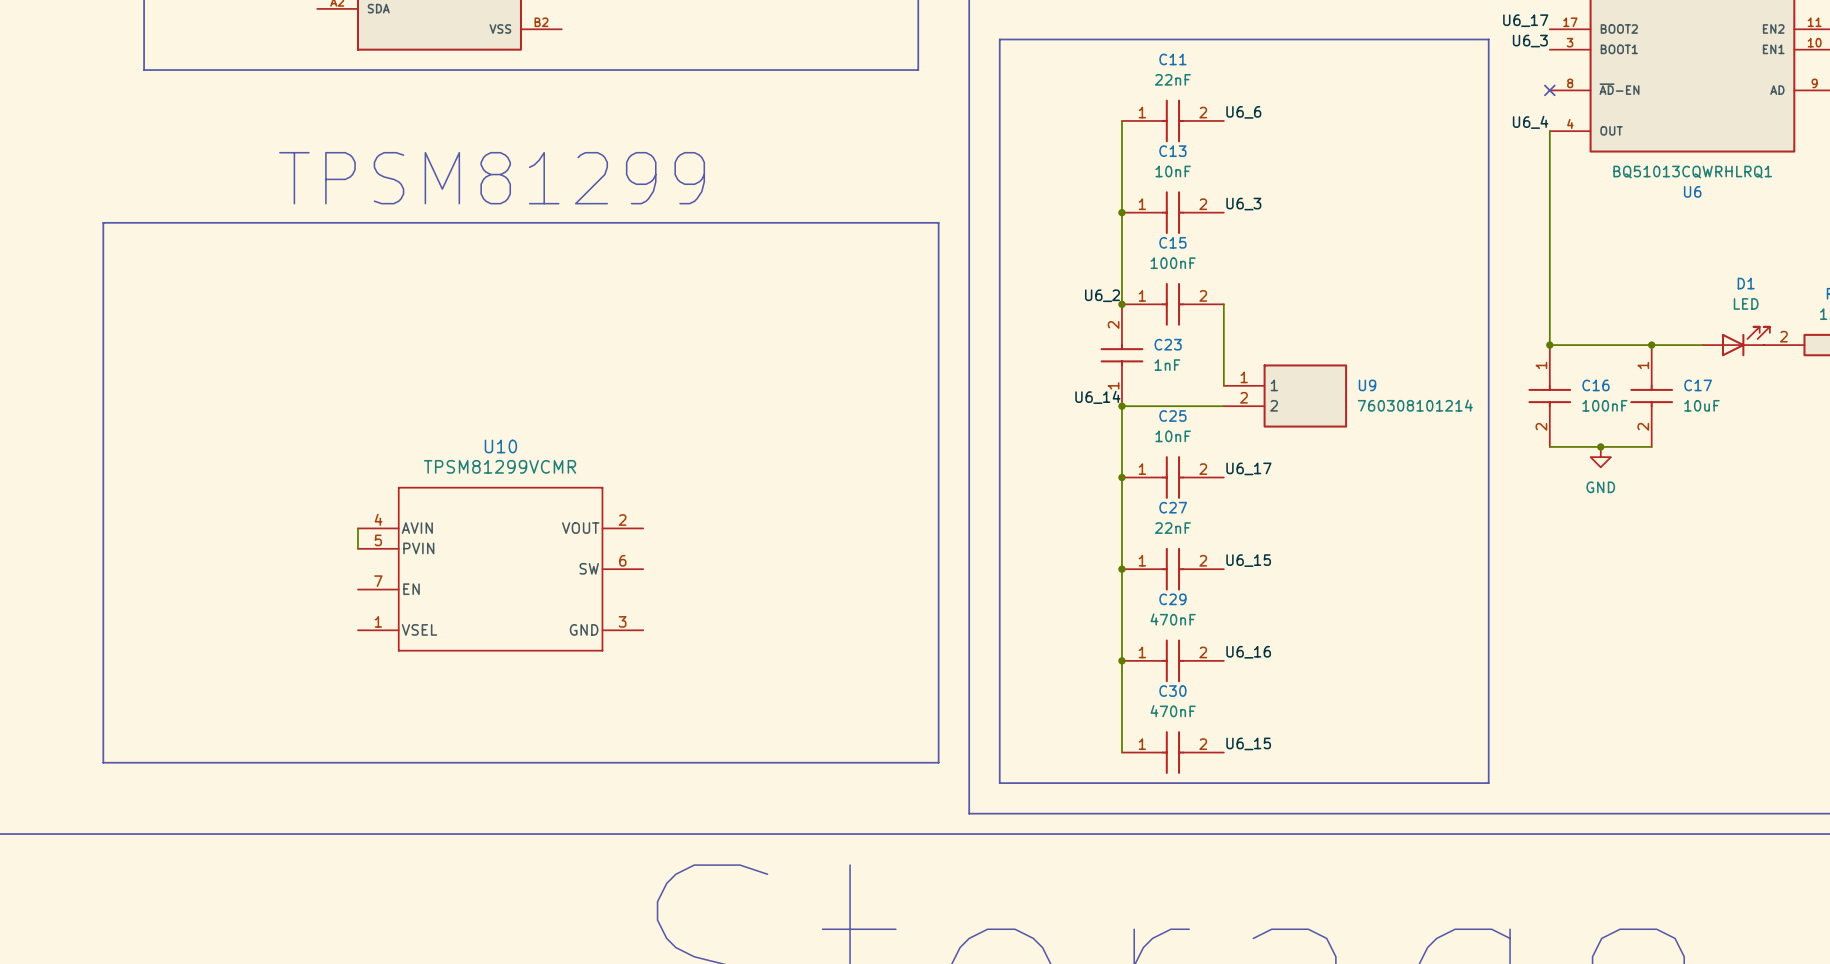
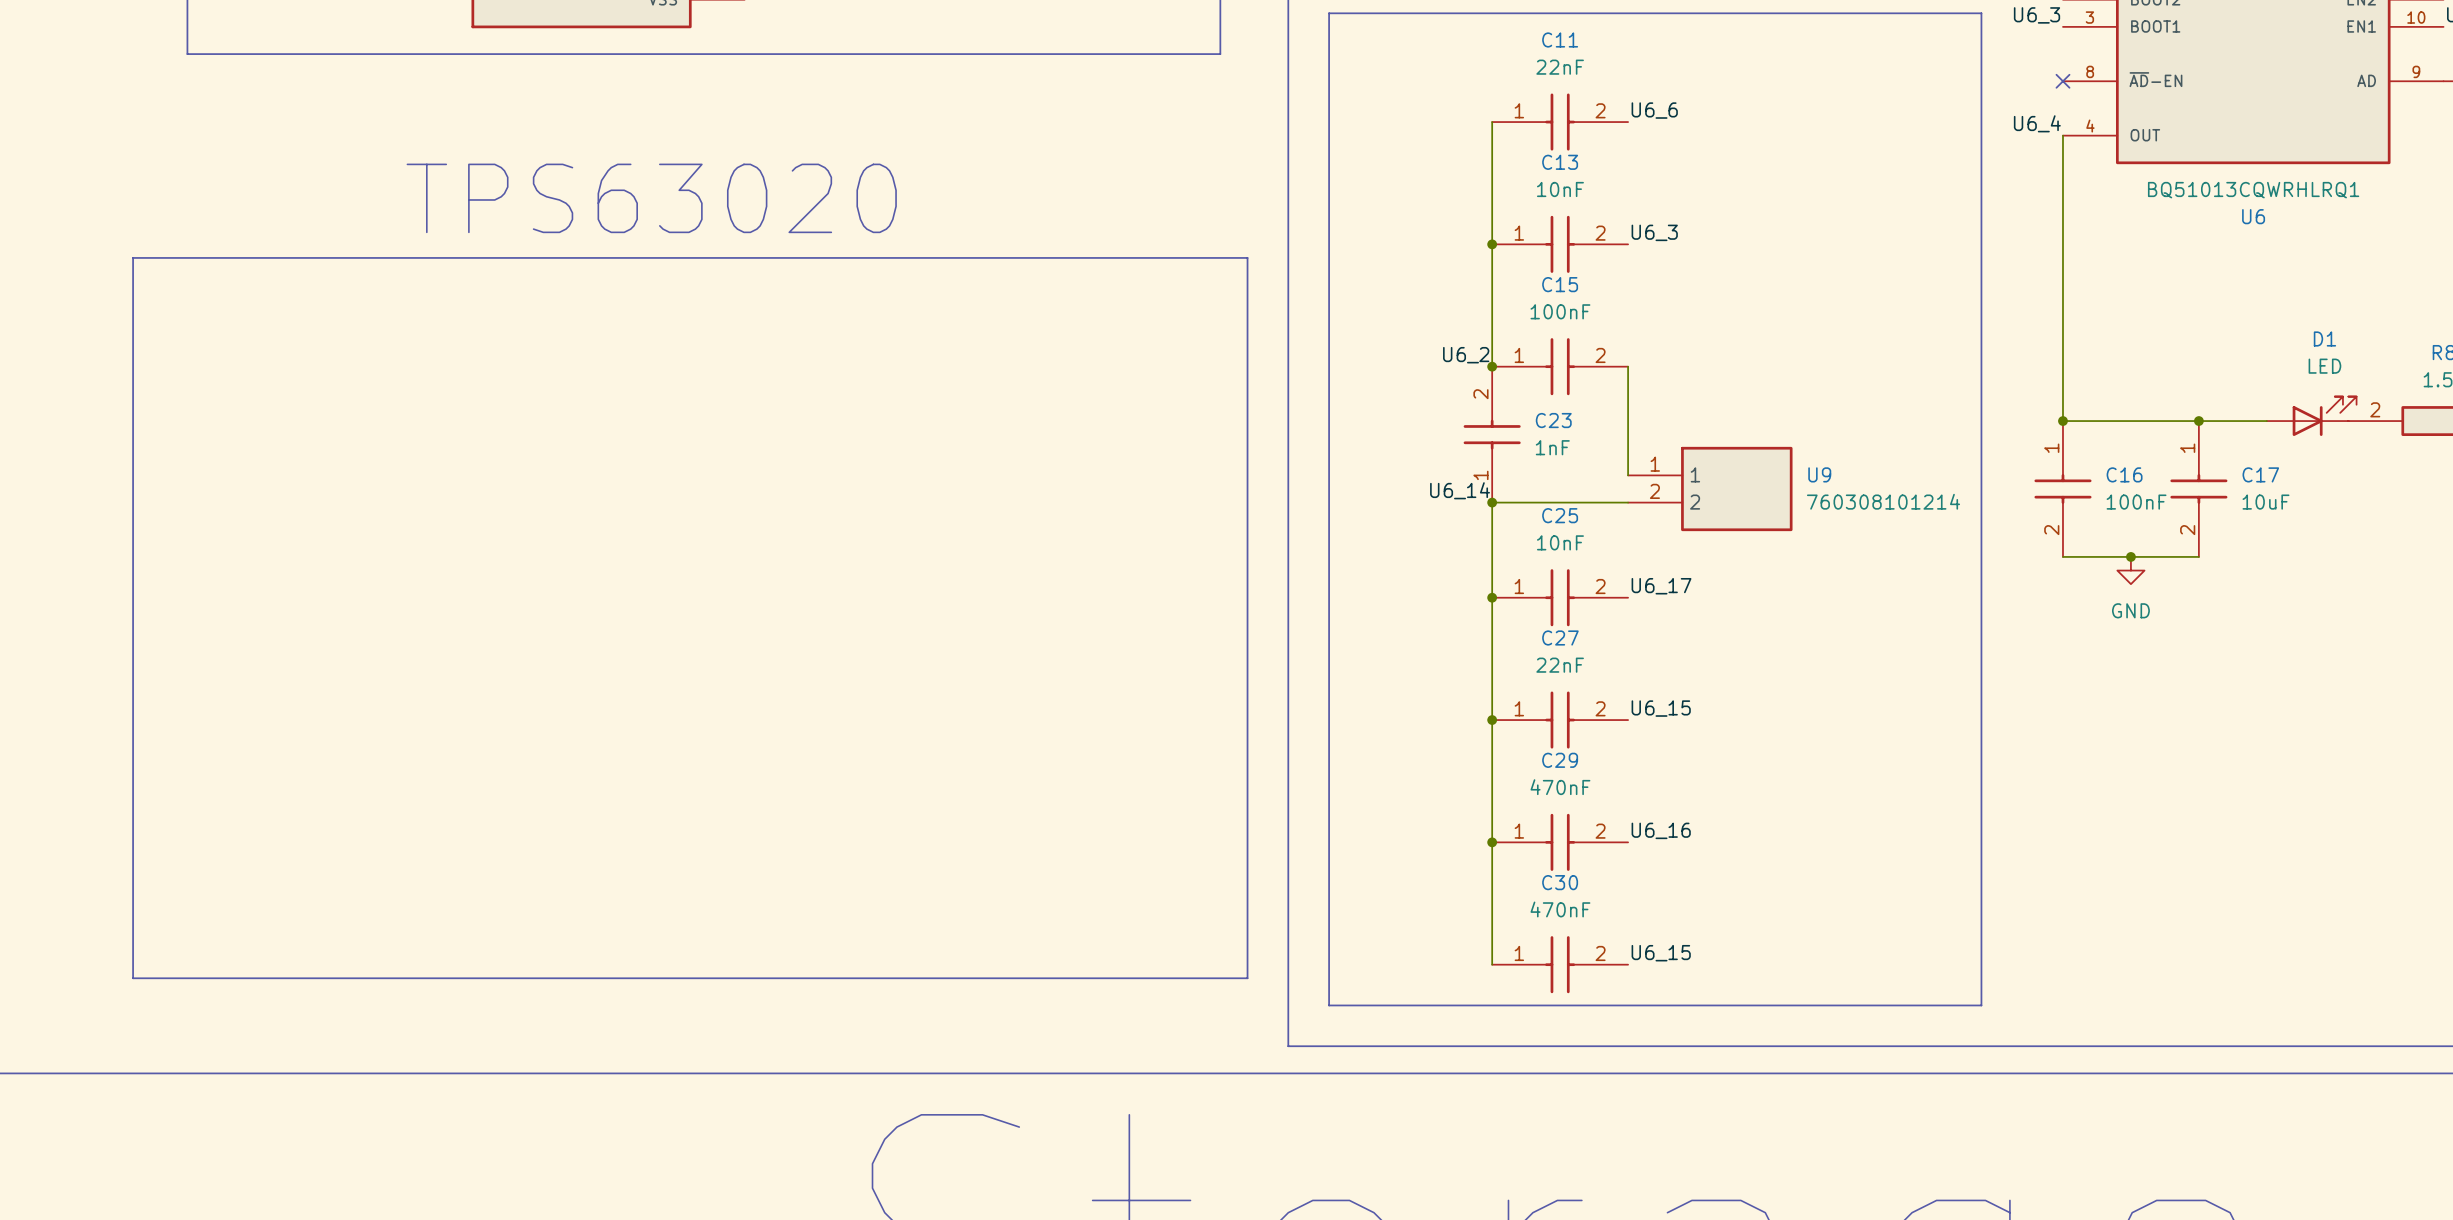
text: TPSM81299 (492, 178) -> TPS63020 (651, 198)
wire: (357, 528) (357, 548) -> none
U10: TPSM81299VCMR (500, 569) -> none

